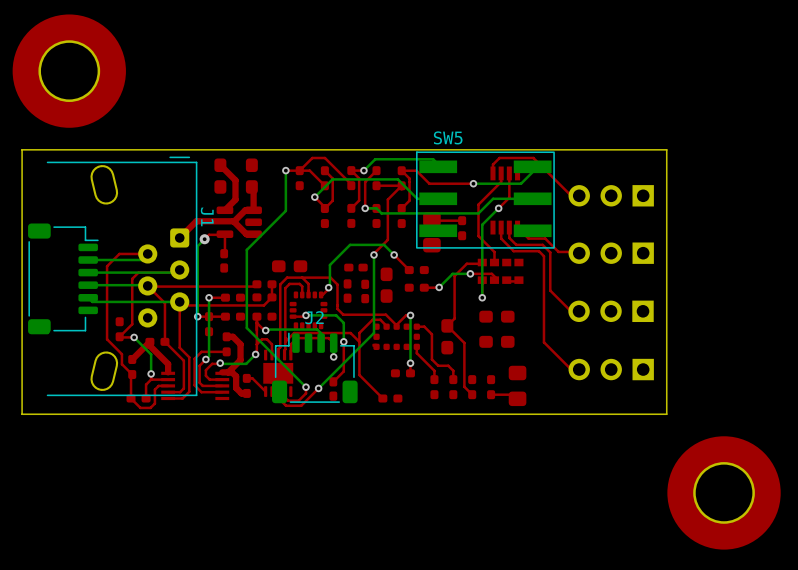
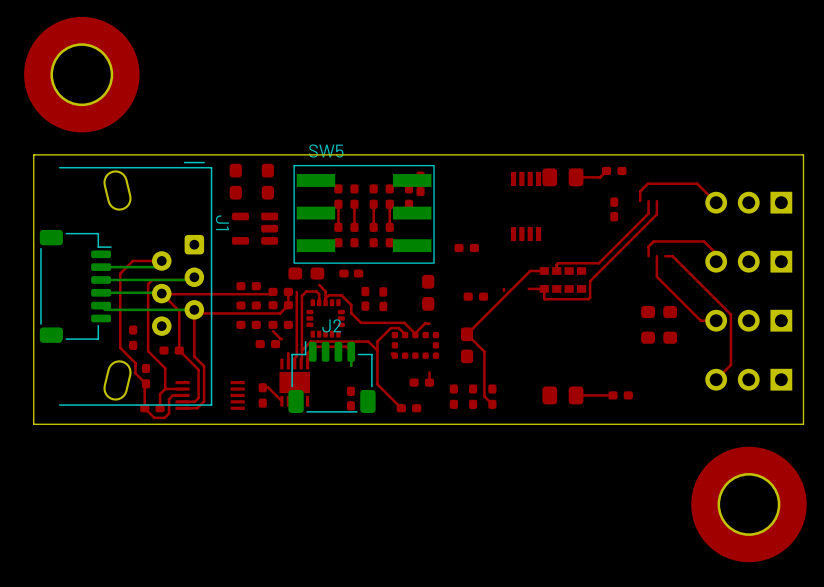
board edge: (666, 149) (666, 414) -> (690, 154) (803, 154) (803, 424) (690, 424)
top track: (220, 165) (235, 180) (235, 199) (224, 210) -> none
top track: none -> (606, 170) (600, 177) (576, 177)
part: none -> (614, 170)
bottom track: (440, 166) (433, 159) (375, 159) (363, 170) -> none
bottom track: (535, 166) (535, 169) (521, 183) (473, 183) -> none
top track: (285, 170) (309, 170) (324, 185) -> none
bottom track: (285, 170) (285, 210) (246, 249) (246, 327) (306, 387) -> none
via: (285, 170) -> none
top track: (299, 170) (312, 158) (324, 158) (351, 185) -> none
top track: (324, 170) (332, 178) (332, 200) (324, 208) (314, 197) -> none
top track: (363, 170) (351, 170) (359, 178) (359, 200) (351, 208) -> none
via: (363, 170) -> none
top track: (376, 170) (365, 181) (365, 208) (376, 208) -> none
part: none -> (562, 177)
top track: (492, 173) (492, 164) (499, 158) (533, 158) (571, 195) (579, 195) -> none
top track: (501, 173) (501, 181) (478, 204) (478, 236) (494, 252) (494, 262) -> none
top track: (509, 173) (509, 197) (498, 208) -> none
part: (299, 178) -> none
part: (324, 178) -> none
part: (351, 178) -> none
part: (376, 178) -> none
top track: (473, 183) (429, 183) (416, 170) (401, 170) (409, 178) (409, 200) (401, 208) -> none
via: (473, 183) -> none
top track: (401, 185) (376, 185) -> none
top track: (251, 186) (253, 188) (253, 210) (245, 210) (234, 221) (196, 221) (179, 237) -> none
top track: (401, 189) (401, 185) (387, 199) (387, 239) (374, 254) -> none
part: none -> (338, 196)
part: none -> (354, 196)
part: none -> (373, 196)
part: none -> (389, 196)
part: none -> (408, 196)
part: (611, 195) -> none
top track: none -> (640, 201) (640, 191) (647, 183) (697, 183) (716, 202)
top track: none -> (648, 201) (648, 213) (598, 263) (558, 263) (556, 270)
top track: none -> (656, 201) (656, 214) (590, 281) (588, 299) (544, 299) (544, 288)
part: none -> (748, 202)
bottom track: (314, 197) (332, 179) (397, 179) (417, 198) (440, 198) -> none
via: (314, 197) -> none
top track: none -> (338, 204) (338, 227)
top track: none -> (354, 204) (354, 227)
top track: none -> (373, 204) (373, 227)
top track: none -> (389, 204) (389, 227)
bottom track: (535, 198) (493, 198) (478, 213) (381, 213) (376, 208) (365, 208) -> none
SW5 position: (485, 200) -> (364, 214)
part: none -> (614, 209)
via: (365, 208) -> none
bottom track: (498, 208) (482, 224) (482, 297) -> none
via: (498, 208) -> none
part: (351, 215) -> none
part: (376, 215) -> none
part: (324, 216) -> none
part: (401, 216) -> none
top track: (431, 219) (462, 220) -> none
top track: (233, 221) (246, 234) (253, 234) -> none
top track: (501, 227) (501, 238) (513, 251) (538, 251) (543, 256) (543, 342) (571, 369) (579, 369) -> none
top track: (509, 227) (509, 237) (516, 244) (542, 244) (550, 252) (550, 290) (570, 311) (579, 311) -> none
top track: (517, 227) (528, 238) (545, 238) (558, 251) (579, 253) -> none
part: none -> (338, 235)
part: none -> (354, 235)
part: none -> (373, 235)
part: none -> (389, 235)
part rotation: 0° (462, 228) -> 90° clockwise (466, 248)
part position: (462, 228) -> (466, 248)
part: (431, 232) -> none
top track: (204, 239) (209, 234) (224, 234) (224, 253) -> none
bottom track: (204, 239) (197, 246) (197, 316) -> none
via: (204, 239) -> none
top track: none -> (648, 256) (648, 246) (653, 241) (704, 241) (716, 253) (716, 261)
top track: none -> (656, 256) (656, 276) (700, 320) (716, 320)
top track: none -> (665, 256) (672, 256) (730, 314) (730, 364) (716, 379)
part: (611, 253) -> none
bottom track: (374, 254) (374, 333) (318, 388) -> none
via: (374, 254) -> none
top track: (394, 254) (409, 270) -> none
bottom track: (394, 254) (384, 244) (350, 244) (329, 265) (328, 287) -> none
via: (394, 254) -> none
part: none -> (748, 261)
part: (224, 260) -> none
top track: (483, 263) (466, 263) (454, 276) (454, 318) -> (544, 270) (530, 270) (474, 326)
part position: (355, 267) -> (351, 273)
part: (416, 270) -> none
part position: (500, 271) -> (562, 279)
top track: (470, 273) (491, 273) (495, 277) (495, 281) -> none
bottom track: (470, 273) (452, 273) (439, 287) -> none
via: (470, 273) -> none
top track: (134, 276) (132, 278) (132, 324) (119, 336) (134, 337) -> (148, 284) (148, 351) (165, 368) (165, 383)
part: none -> (248, 286)
part footprint: [404, 283, 429, 292] -> [422, 274, 435, 311]
top track: (280, 284) (287, 277) (330, 277) (337, 284) (337, 308) -> (325, 298) (328, 295) (341, 295) (351, 304) (351, 313) (355, 316)
part: (386, 285) -> none
top track: (328, 287) (321, 294) -> none
via: (328, 287) -> none
top track: (439, 287) (424, 287) -> none
via: (439, 287) -> none
part: none -> (475, 296)
bottom track: (209, 297) (209, 356) (205, 359) -> none
via: (209, 297) -> none
top track: (225, 297) (209, 297) -> none
via: (482, 297) -> none
part: none -> (659, 312)
part: (611, 311) -> none
part: none -> (748, 320)
top track: (306, 315) (293, 316) -> none
bottom track: (306, 315) (336, 315) (343, 322) (343, 341) -> none
via: (306, 315) -> none
bottom track: (410, 315) (410, 363) -> none
via: (410, 315) -> none
via: (197, 316) -> none
top track: (225, 316) (197, 316) -> none
part: (496, 316) -> none
part: (209, 324) -> none
top track: (416, 326) (424, 326) (431, 334) (431, 359) (438, 365) (448, 365) (453, 370) (453, 379) -> none
part: none -> (659, 337)
bottom track: (265, 330) (317, 329) (321, 333) (321, 343) -> none
via: (265, 330) -> none
part: none -> (267, 344)
top track: (226, 336) (232, 336) (240, 344) (240, 360) (228, 372) -> none
bottom track: (134, 337) (151, 354) (151, 373) -> none
via: (134, 337) -> none
top track: (343, 341) (343, 371) (333, 381) -> none
via: (343, 341) -> none
part: (496, 341) -> none
part: (226, 344) -> none
top track: (271, 344) (266, 339) (261, 339) (256, 344) -> none
top track: (416, 346) (416, 353) (434, 370) (434, 379) -> none
top track: (226, 351) (201, 351) (194, 358) (194, 385) (201, 392) (222, 392) -> none
bottom track: (255, 354) (246, 363) (220, 363) -> none
via: (255, 354) -> none
via: (333, 356) -> none
top track: (132, 359) (149, 341) (149, 345) (168, 364) (168, 372) -> none
top track: (205, 359) (199, 365) (199, 382) (202, 385) (222, 385) -> none
via: (205, 359) -> none
top track: (220, 363) (212, 363) (205, 370) (205, 375) (209, 379) (222, 379) -> none
via: (220, 363) -> none
via: (410, 363) -> none
part: (611, 369) -> none
part: none -> (748, 379)
top track: (222, 372) (232, 372) (236, 376) (236, 388) (241, 393) (245, 393) -> none
via: (151, 373) -> none
part rotation: 0° (517, 385) -> 90° clockwise (562, 395)
top track: none -> (613, 395) (576, 395)
part: none -> (620, 395)
top track: (306, 387) (306, 393) (298, 400) (288, 400) (284, 397) (284, 391) -> none
via: (306, 387) -> none
part: (491, 387) -> none
top track: (318, 388) (301, 405) (286, 405) (278, 397) (278, 391) -> none
via: (318, 388) -> none
top track: (491, 394) (513, 394) (517, 398) -> none

